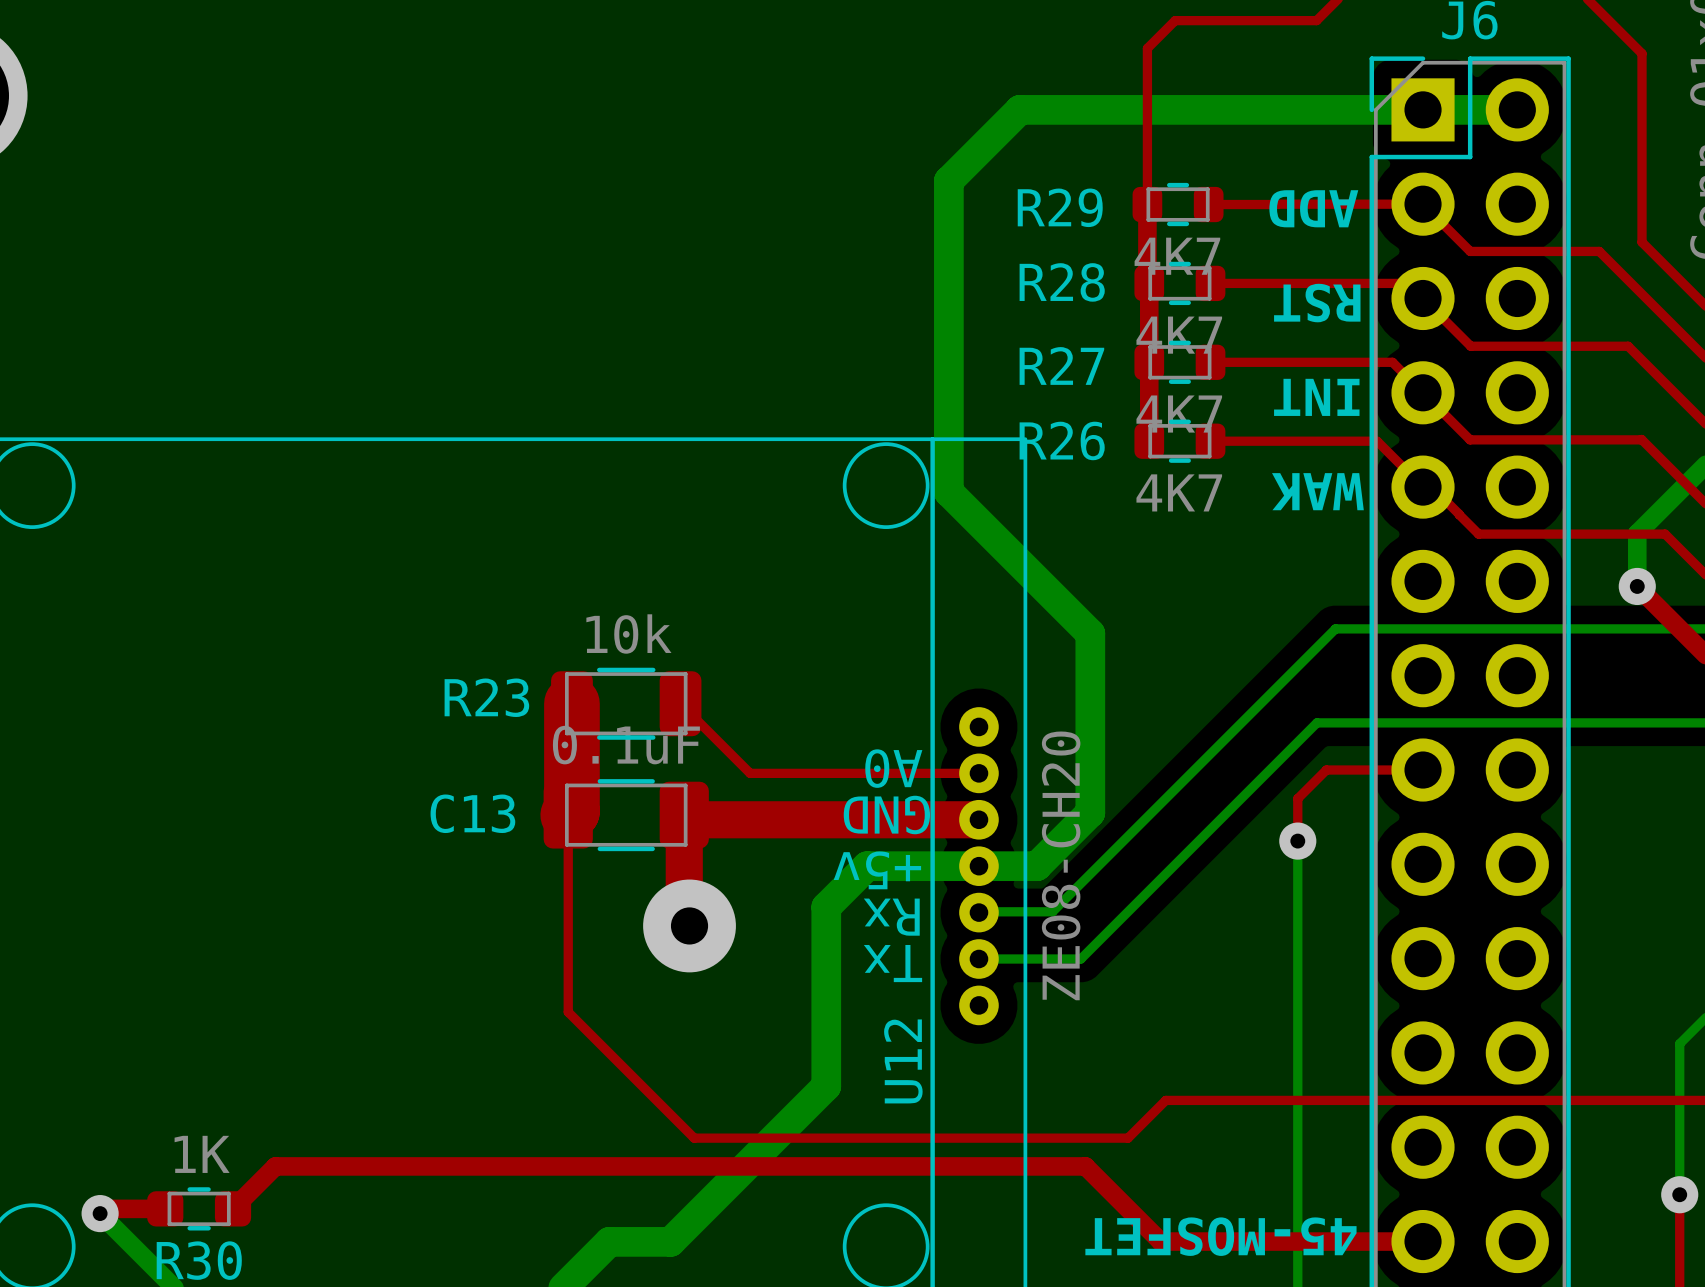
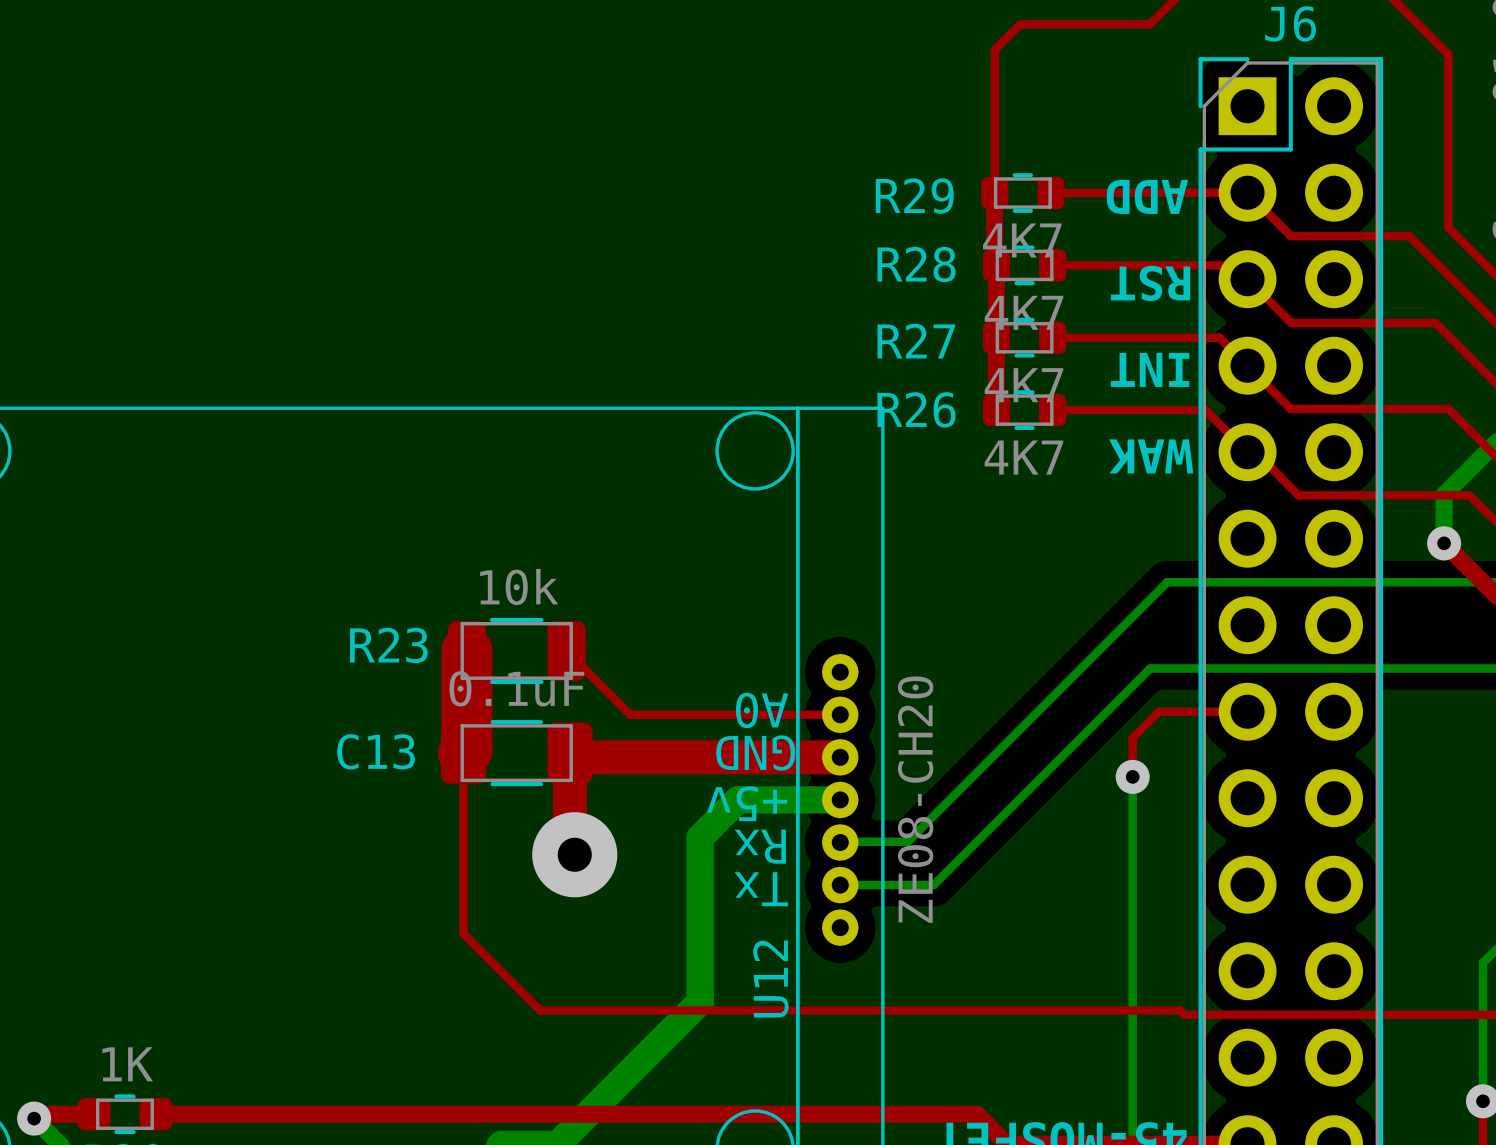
bottom track: (1517, 109) (1019, 109) (948, 180) (948, 492) (1090, 633) (1090, 812) (1036, 866) (978, 866) -> none
top track: (651, 1095) (694, 1138) (1128, 1138) (1165, 1100) (1354, 1100) -> (540, 1010) (1180, 1010) (1184, 1014)
top track: (233, 1208) (275, 1166) (1085, 1166) (1128, 1208) -> (156, 1114) (976, 1114)

